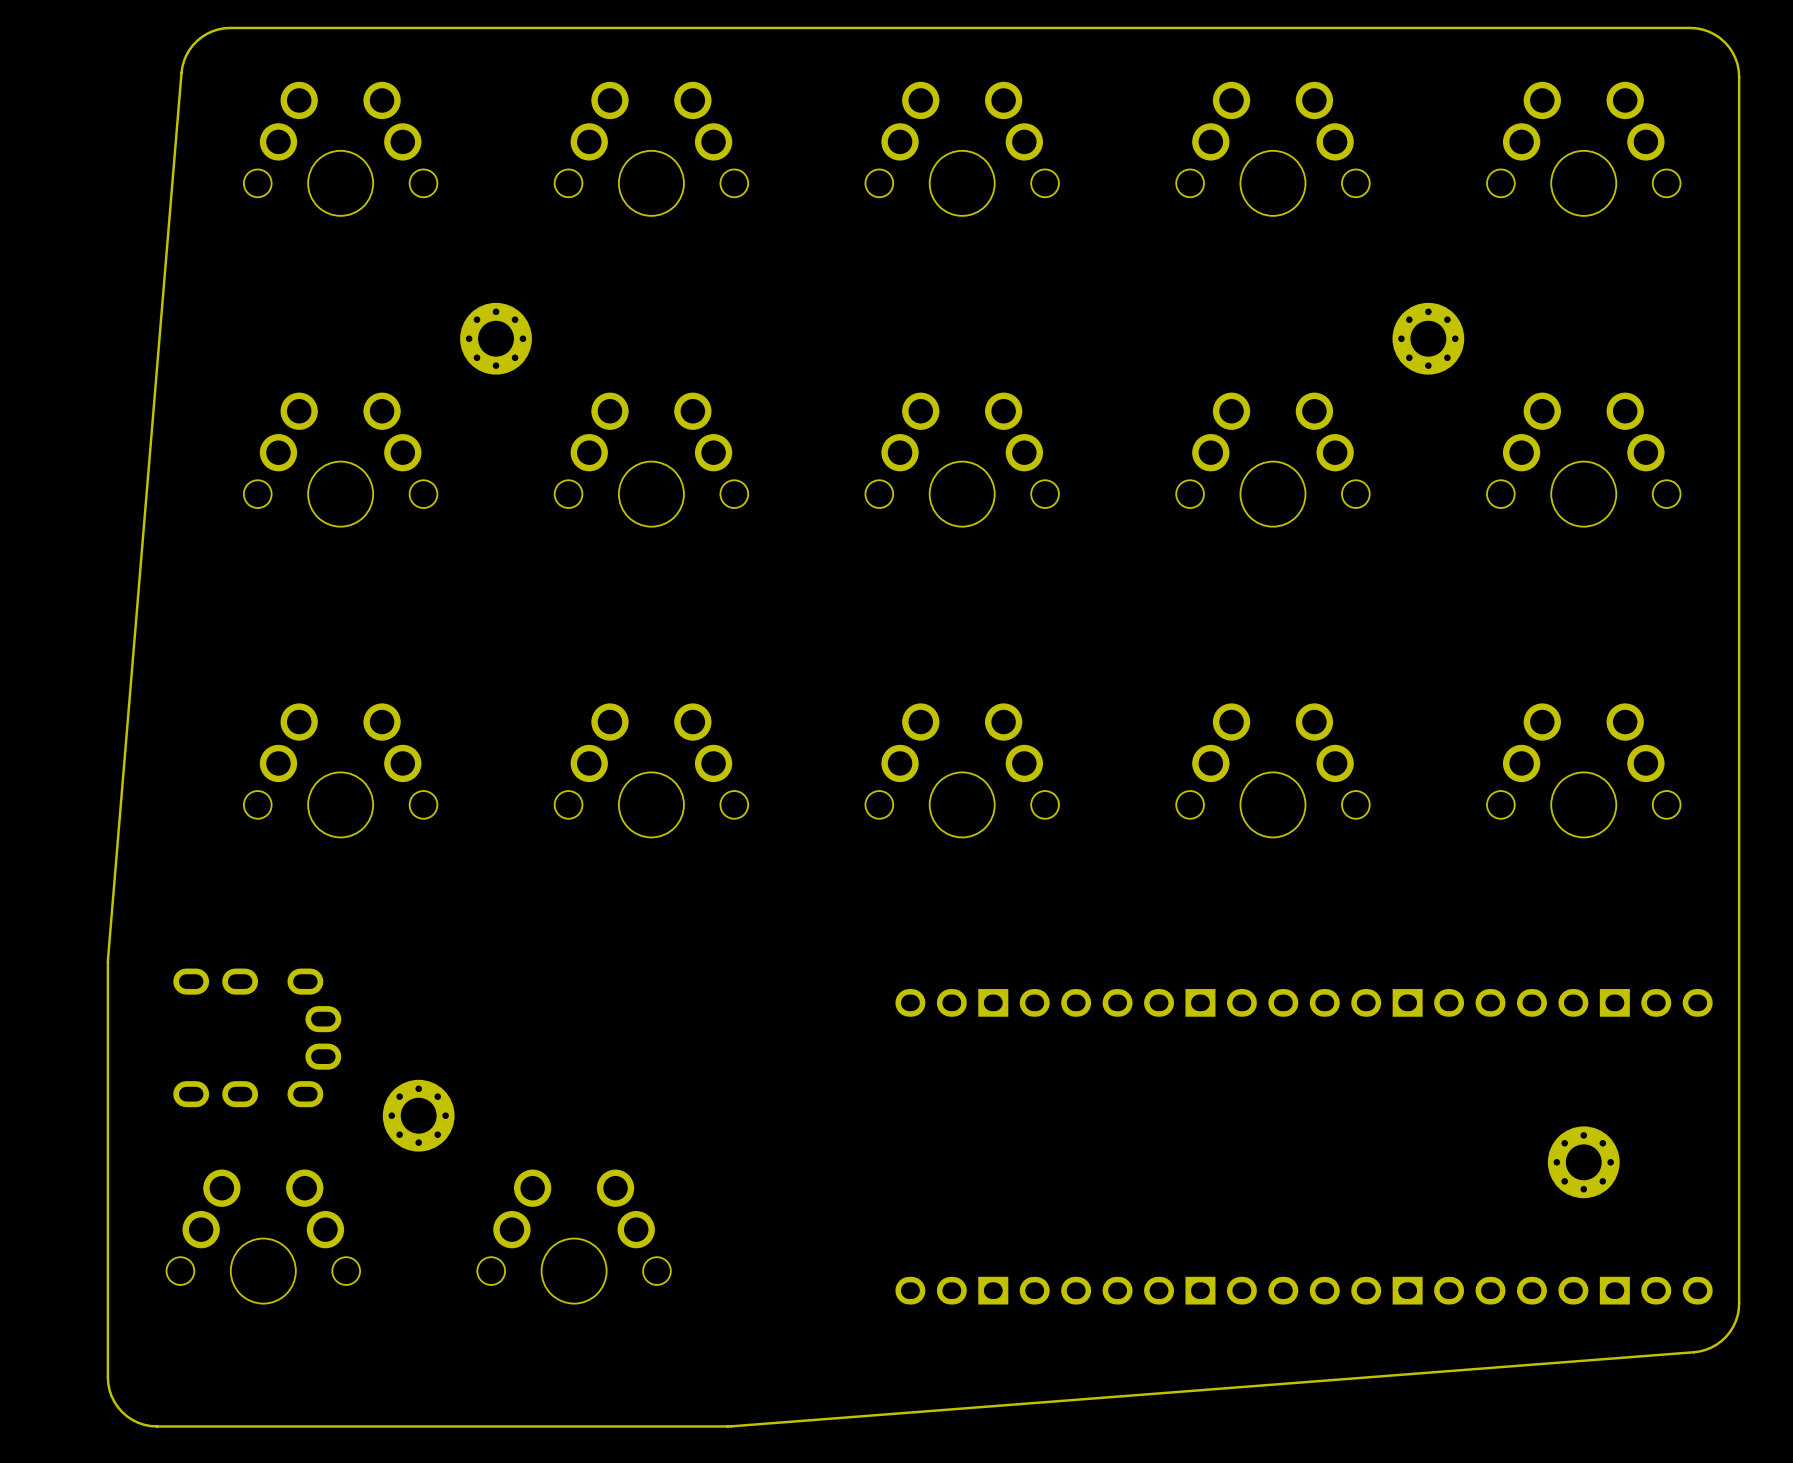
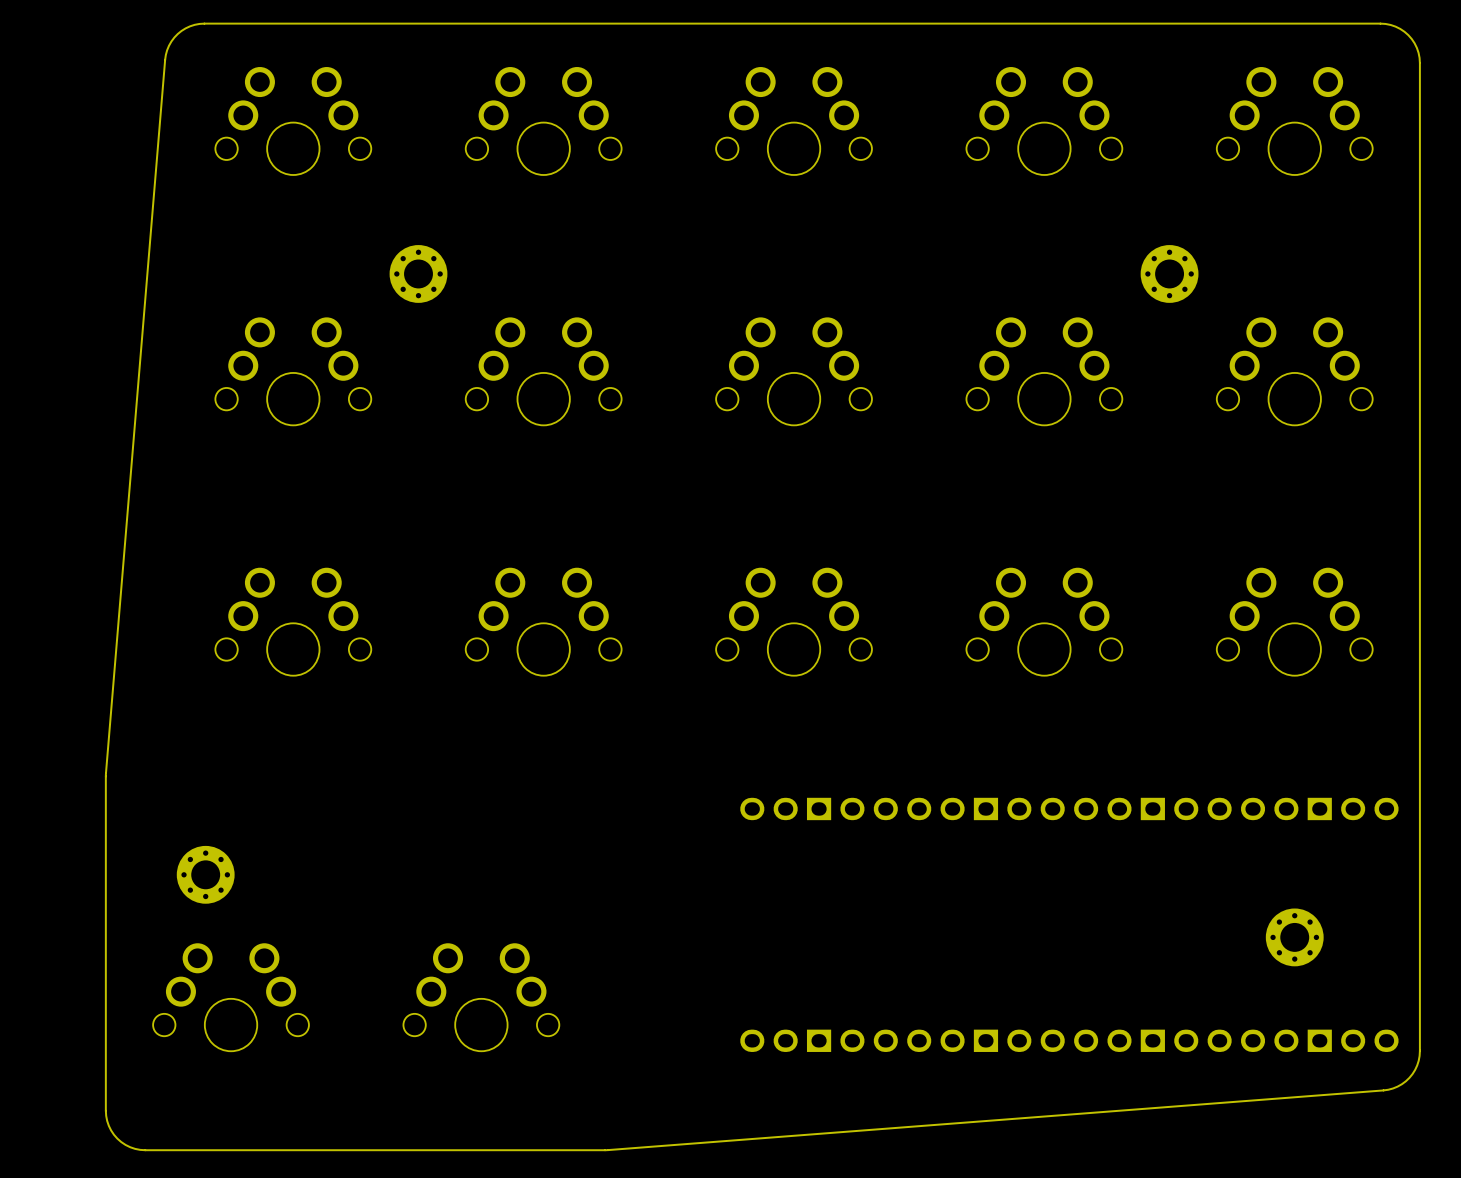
part: (257, 1037) -> none
part position: (418, 1115) -> (205, 874)

